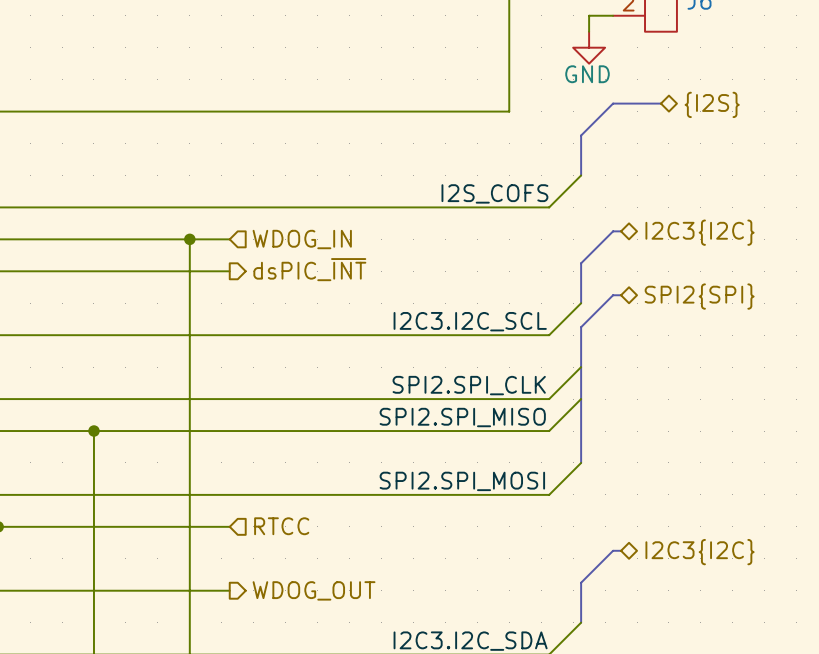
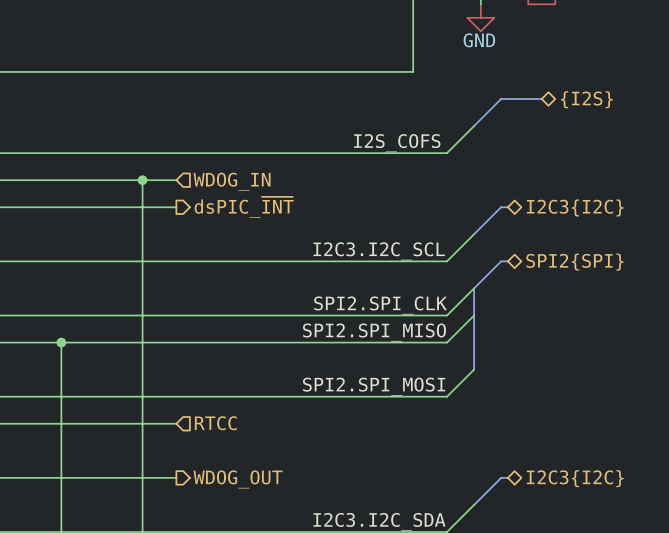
bus: (660, 103) (613, 103) (581, 135) (581, 175) -> (541, 99) (501, 99) (474, 126)
hierarchical label position: {I2S} (712, 104) -> {I2S} (586, 99)
bus: (621, 231) (613, 231) (581, 263) (581, 303) -> (507, 207) (501, 207) (474, 234)
hierarchical label position: I2C3{I2C} (700, 232) -> I2C3{I2C} (575, 207)
bus: (621, 295) (613, 295) (581, 327) (581, 367) -> (507, 261) (501, 261) (474, 288)
hierarchical label position: SPI2{SPI} (699, 296) -> SPI2{SPI} (574, 262)
bus: (621, 550) (613, 550) (581, 582) (581, 622) -> (507, 477) (501, 477) (474, 504)
hierarchical label position: I2C3{I2C} (700, 552) -> I2C3{I2C} (575, 478)

